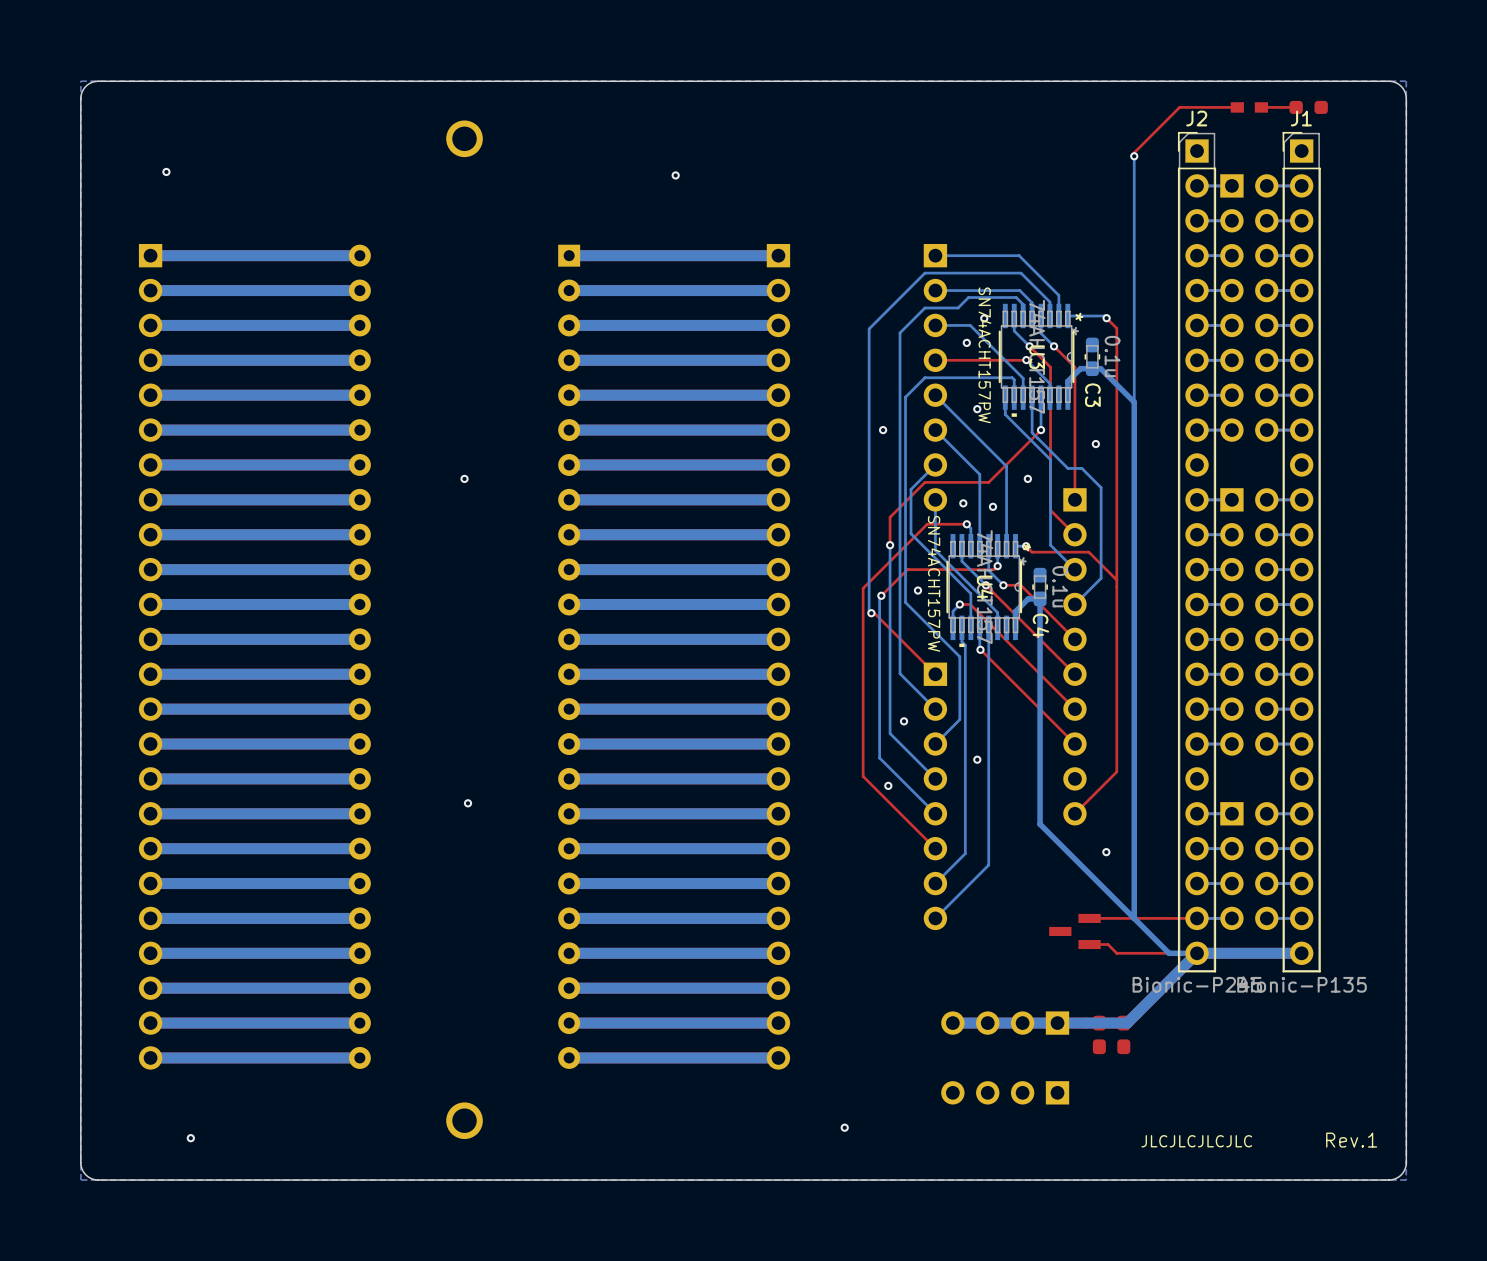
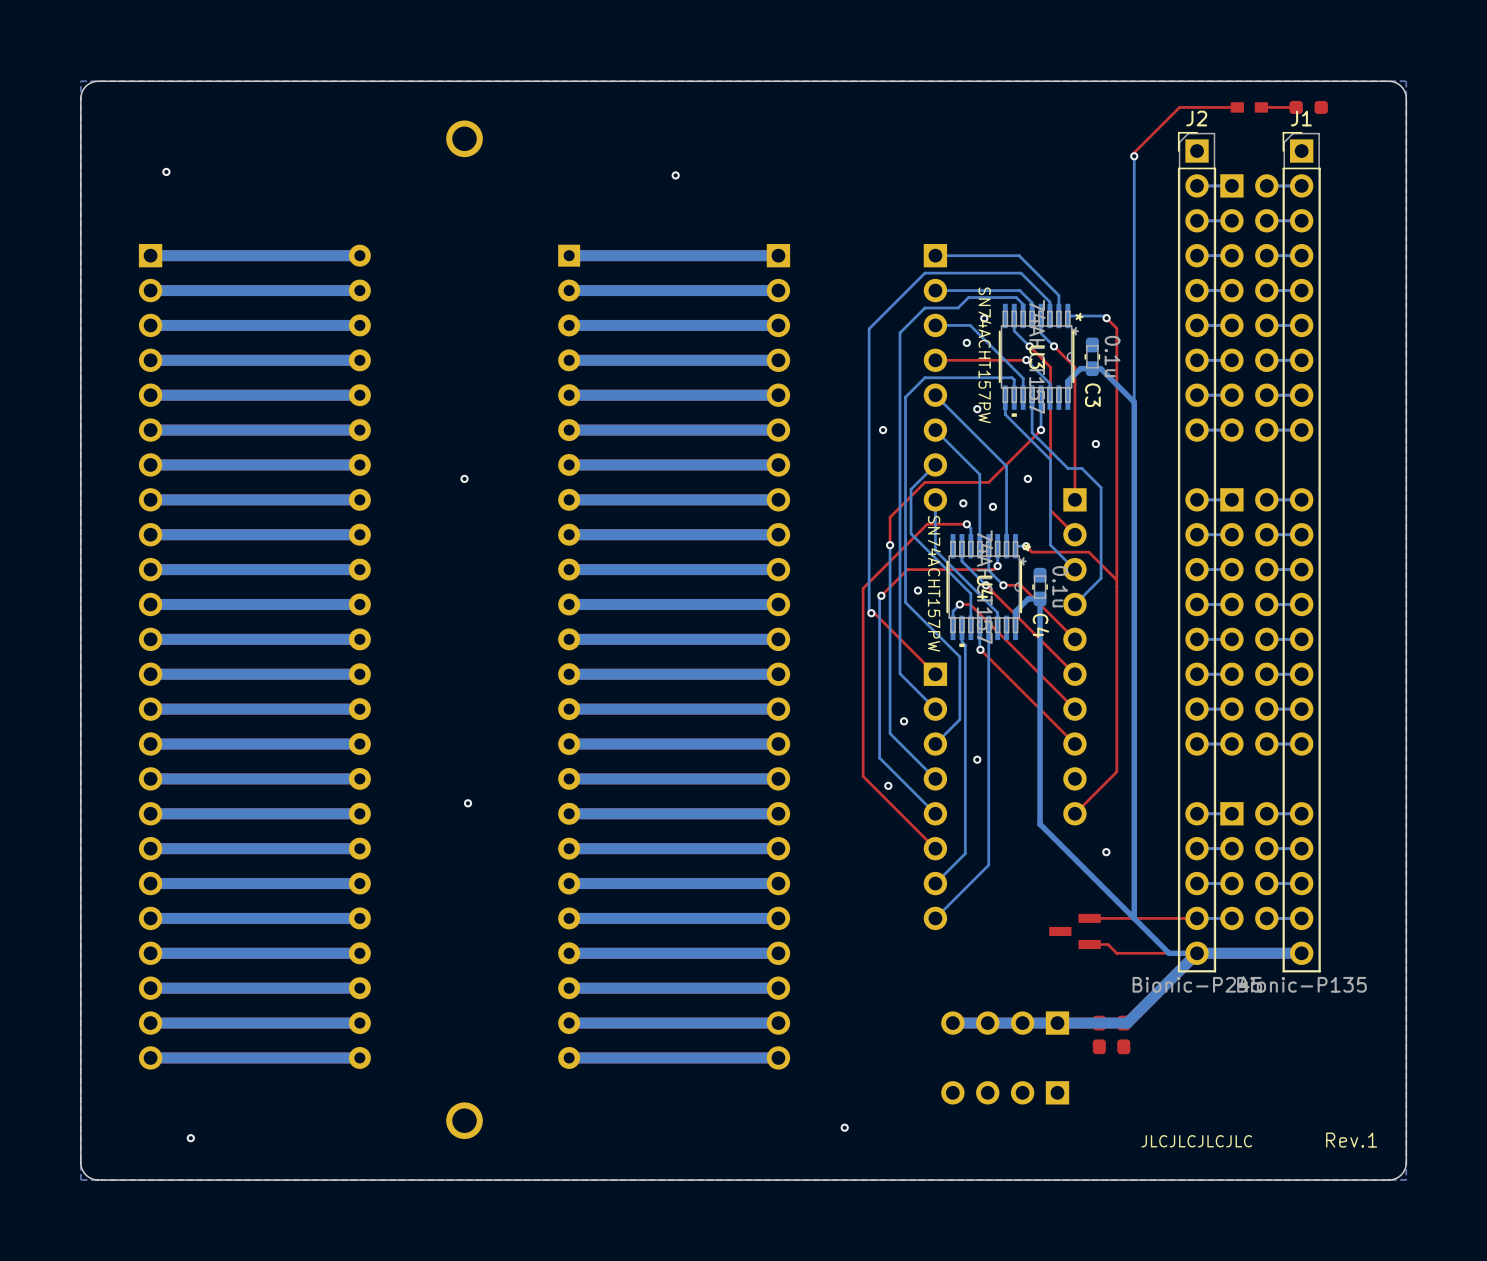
J2 footprint: [1177, 131, 1217, 973] -> [1177, 131, 1217, 973]
J1 footprint: [1282, 131, 1321, 973] -> [1282, 131, 1321, 973]

